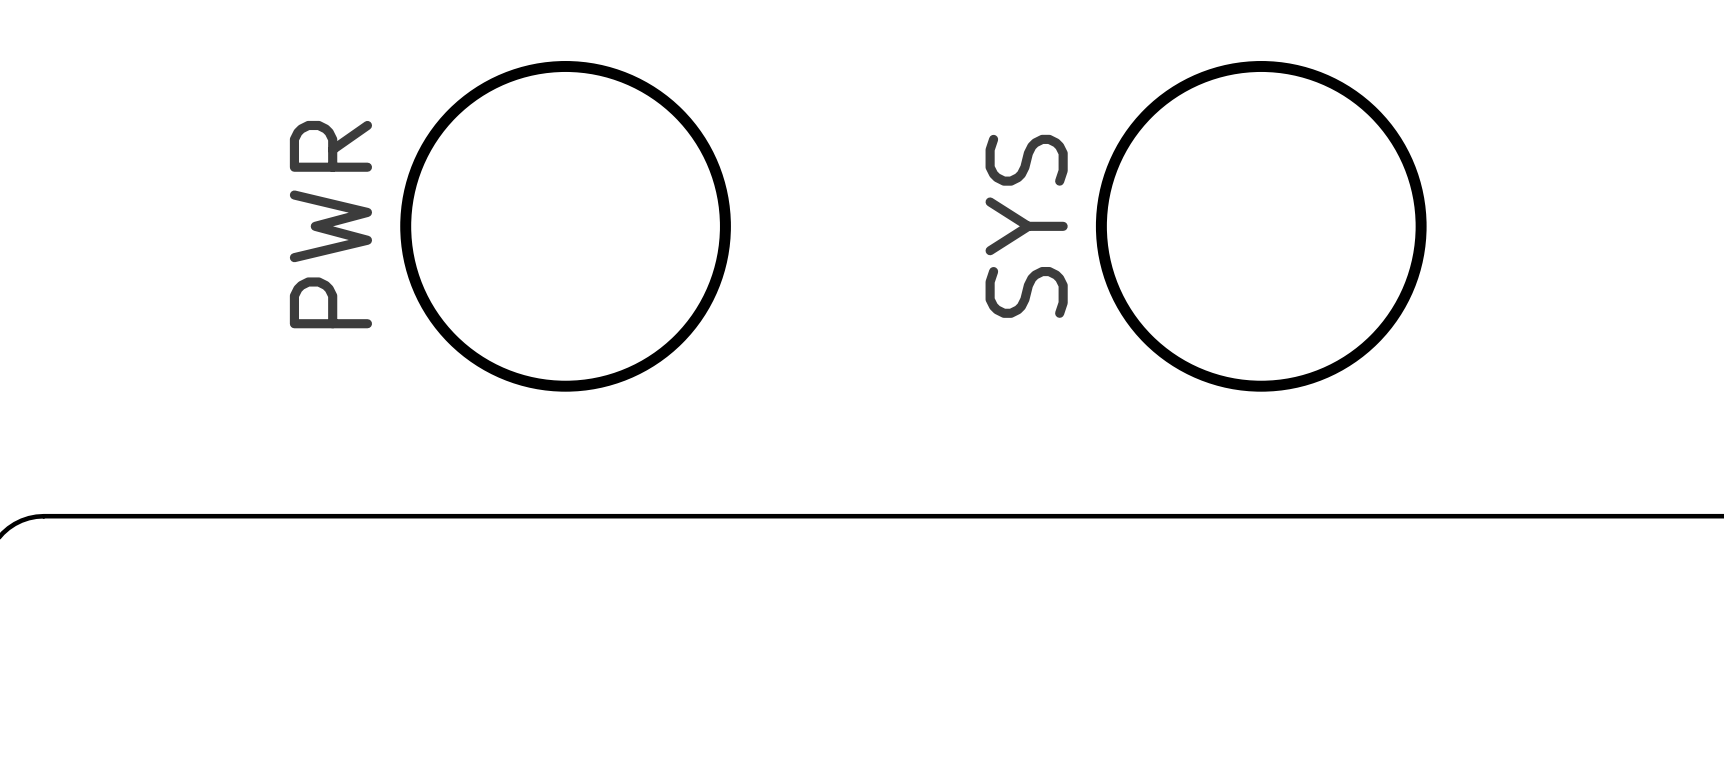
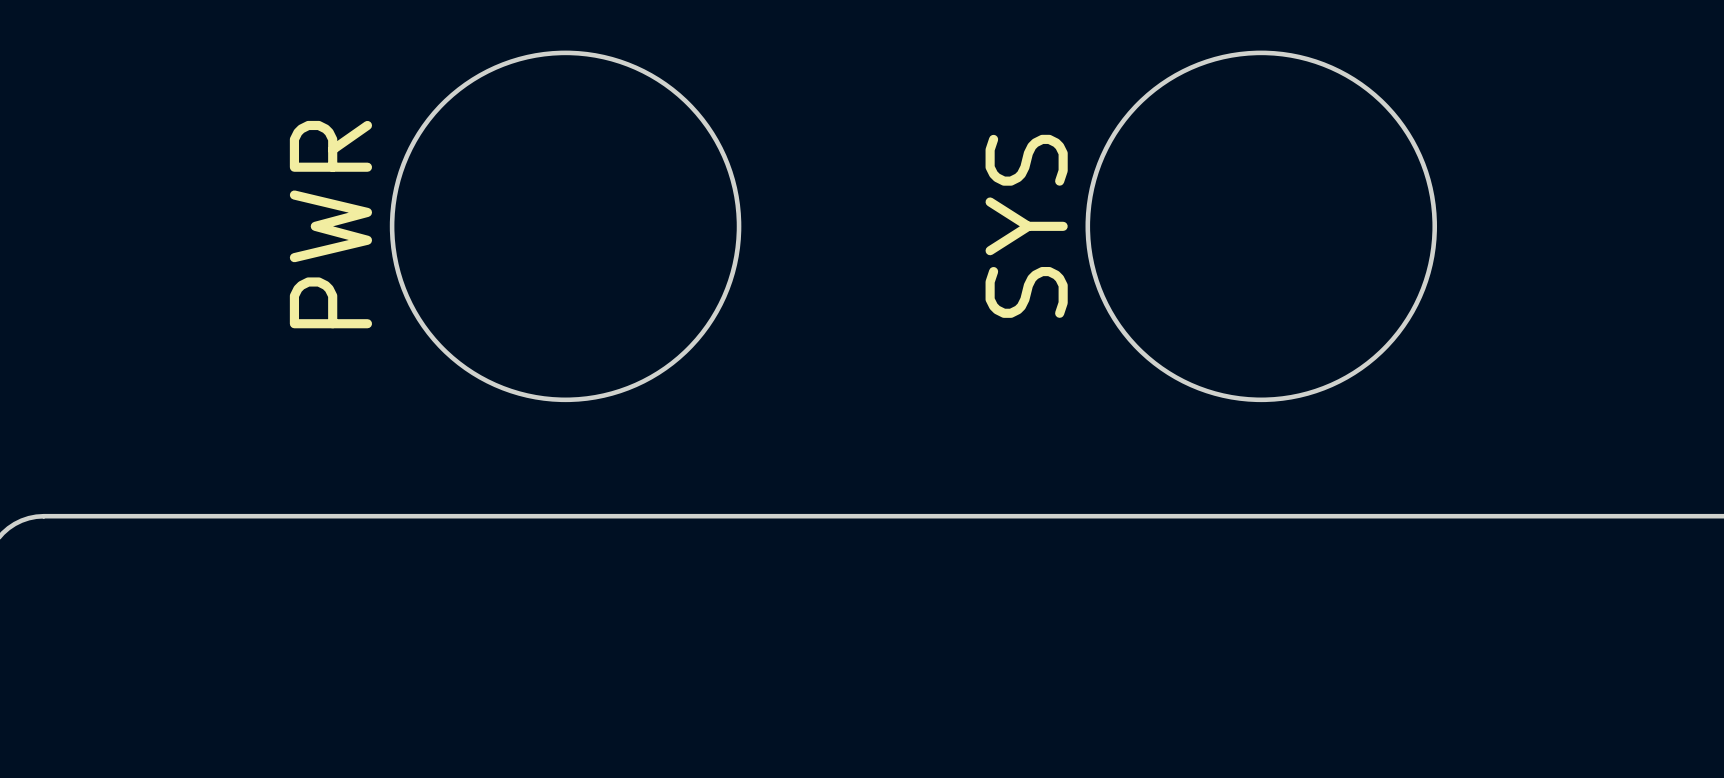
round board edge size: [400, 61, 731, 392] -> [389, 50, 742, 403]
round board edge size: [1095, 61, 1427, 392] -> [1085, 50, 1438, 403]

